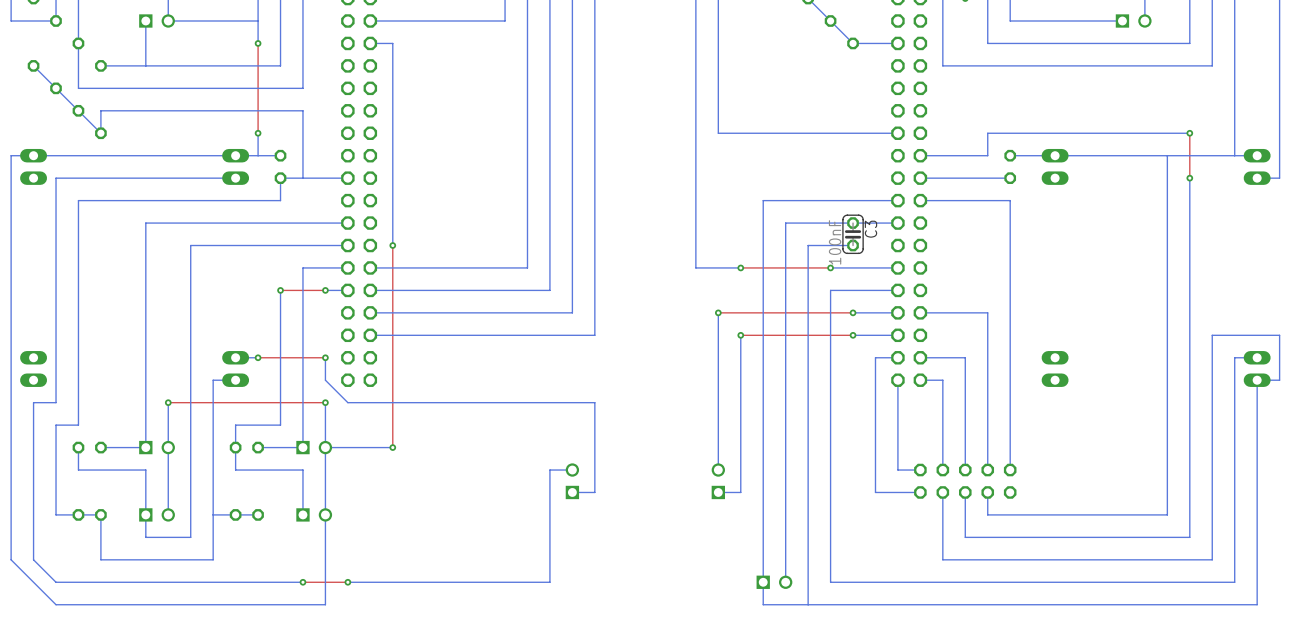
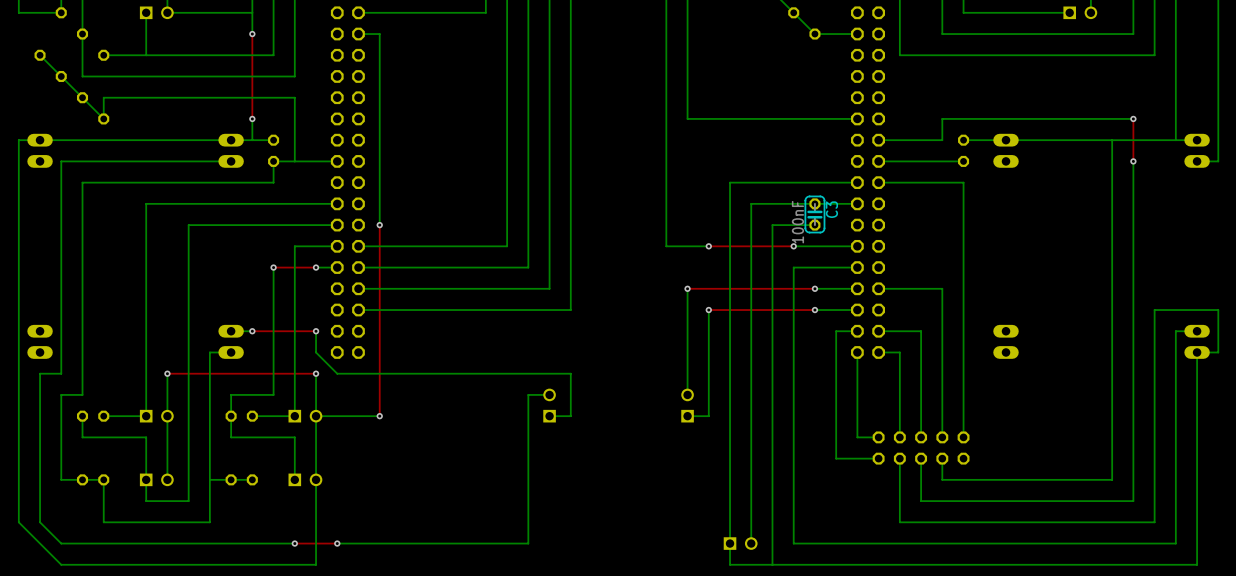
bottom track: (718, 425) (718, 470) -> none
bottom track: (594, 447) (594, 492) (572, 492) -> (570, 416) (549, 416)
bottom track: (740, 447) (740, 492) (718, 492) -> (708, 416) (687, 416)
bottom track: (572, 470) (549, 470) -> (549, 394) (528, 394) (528, 437)
part position: (572, 481) -> (549, 405)
part position: (718, 481) -> (687, 405)

